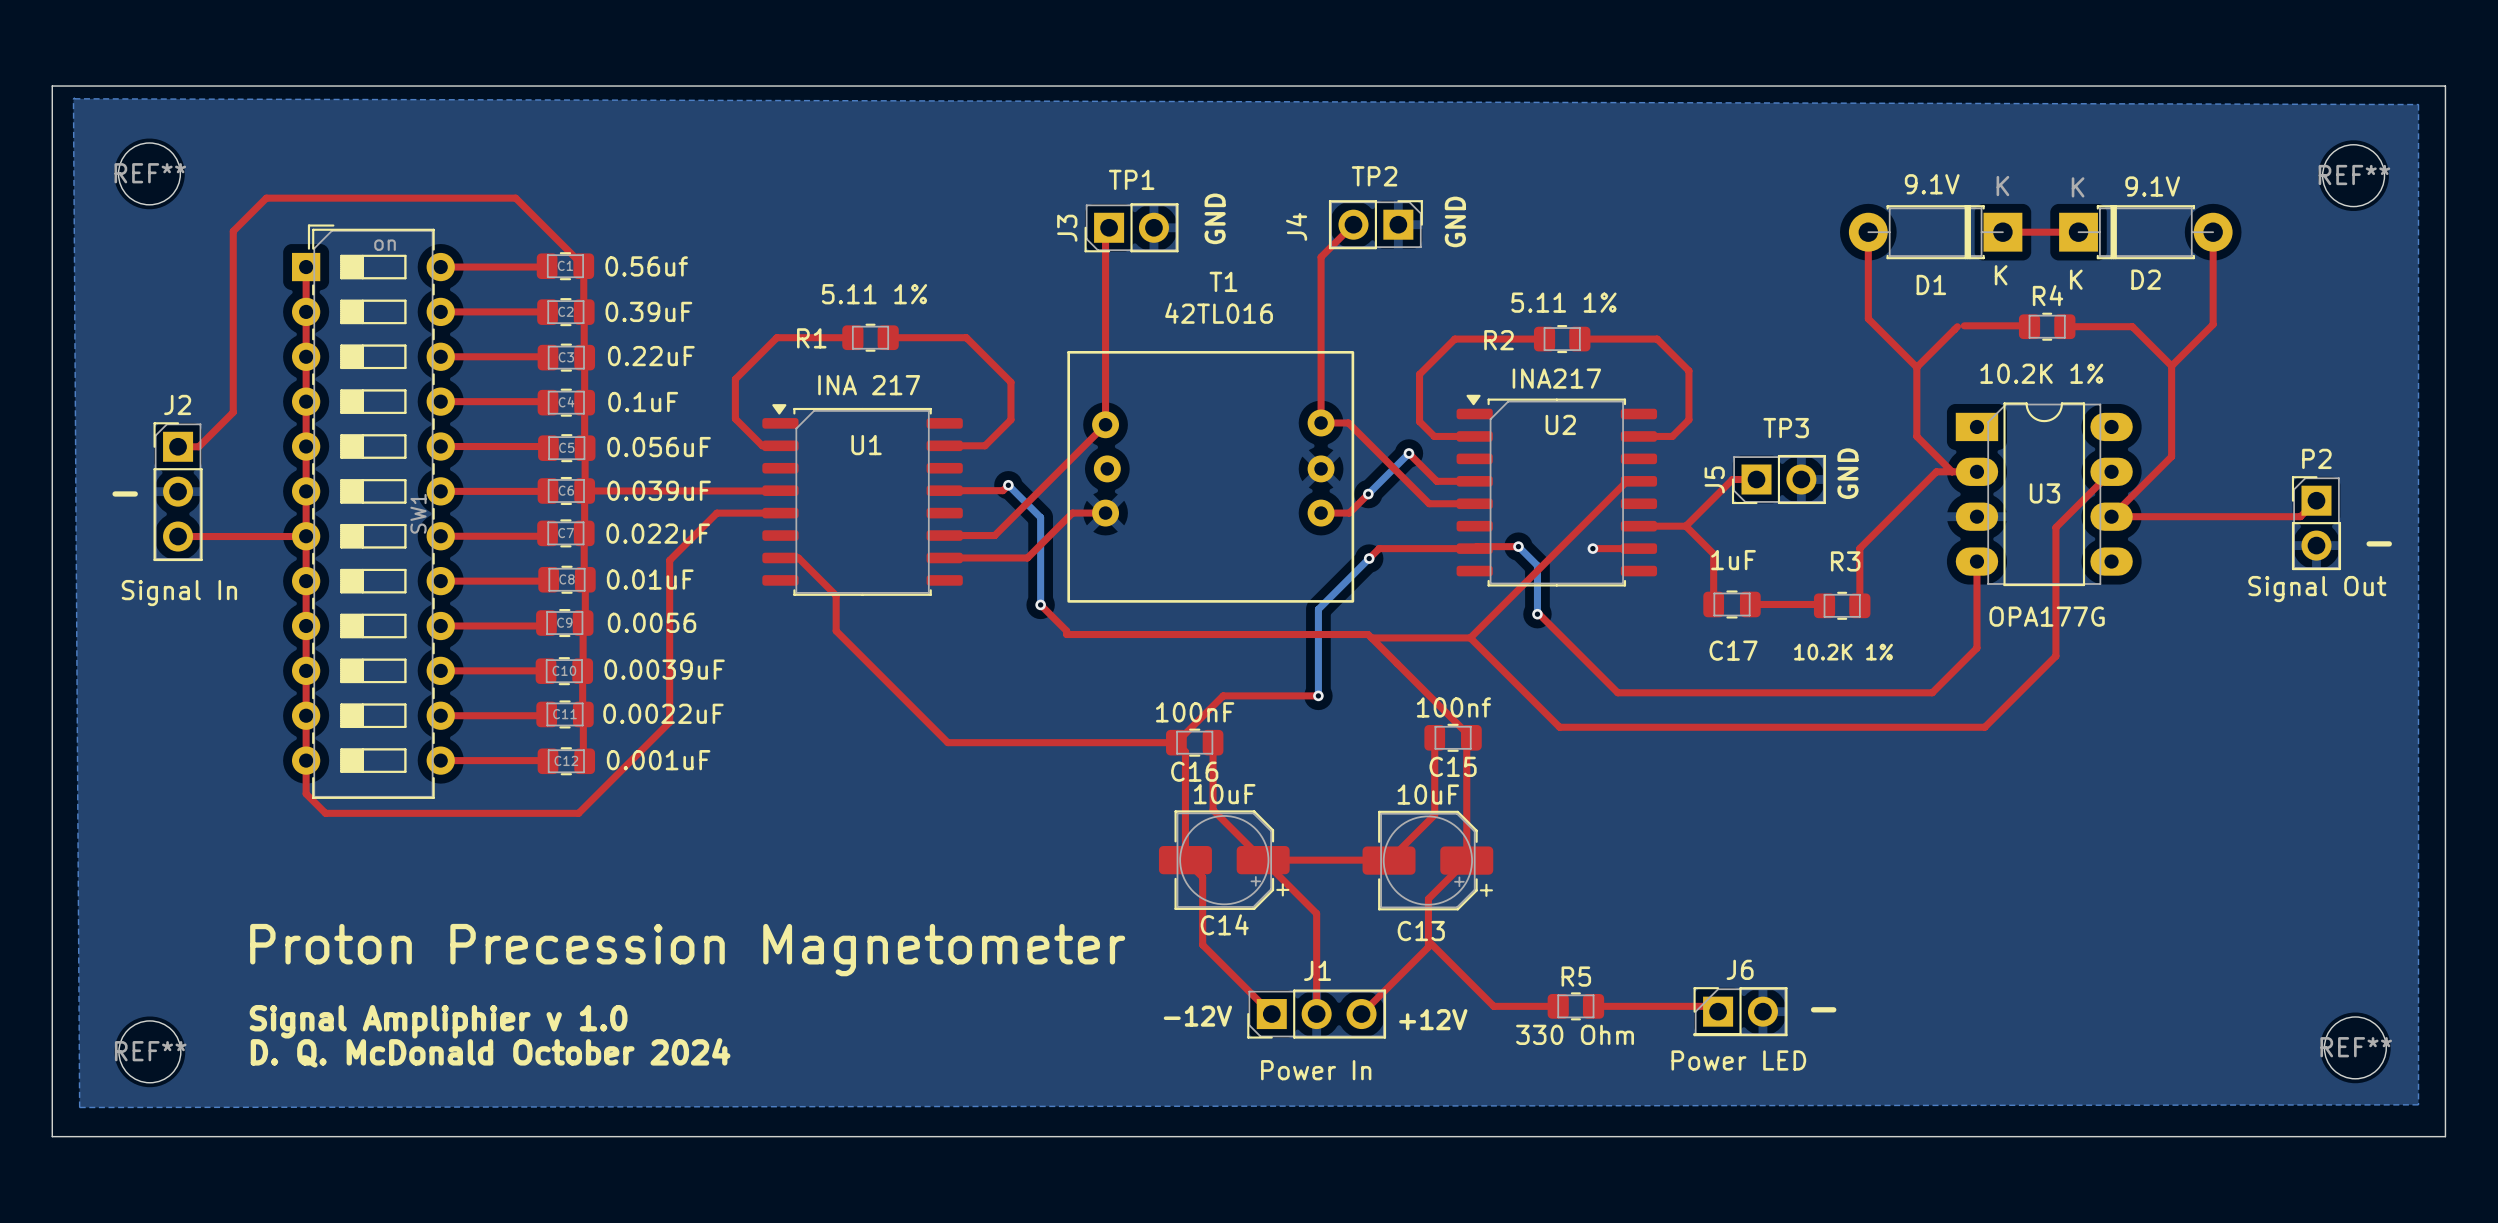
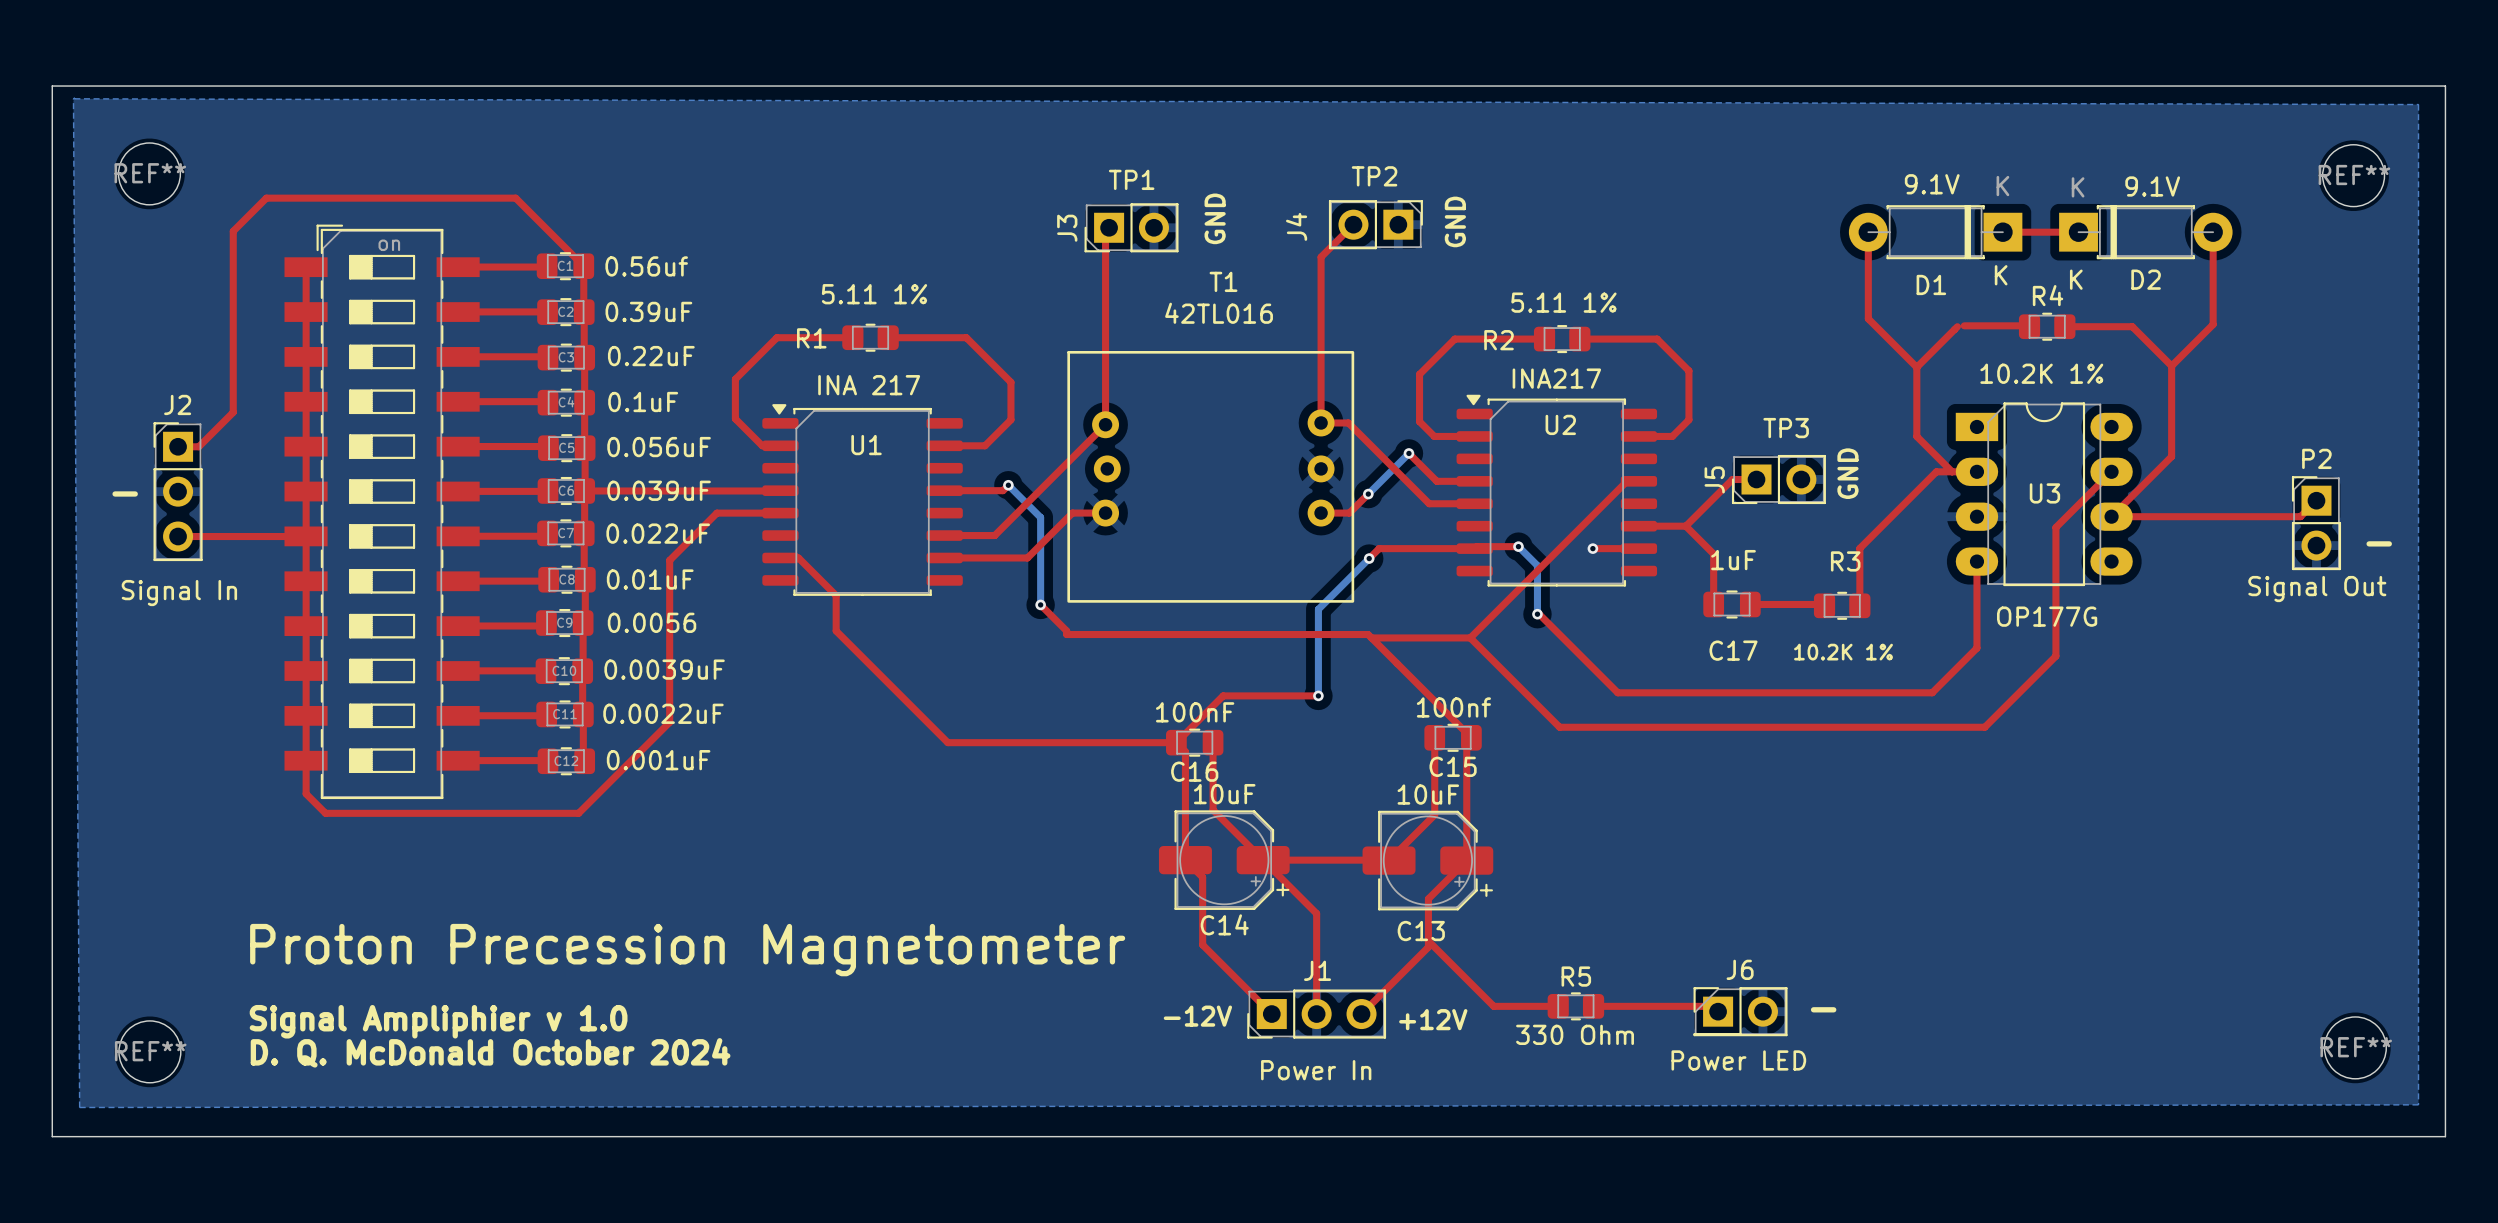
SW1: (373, 511) -> none
part: none -> (382, 511)
U3 value: OPA177G (2047, 616) -> OP177G (2047, 616)

